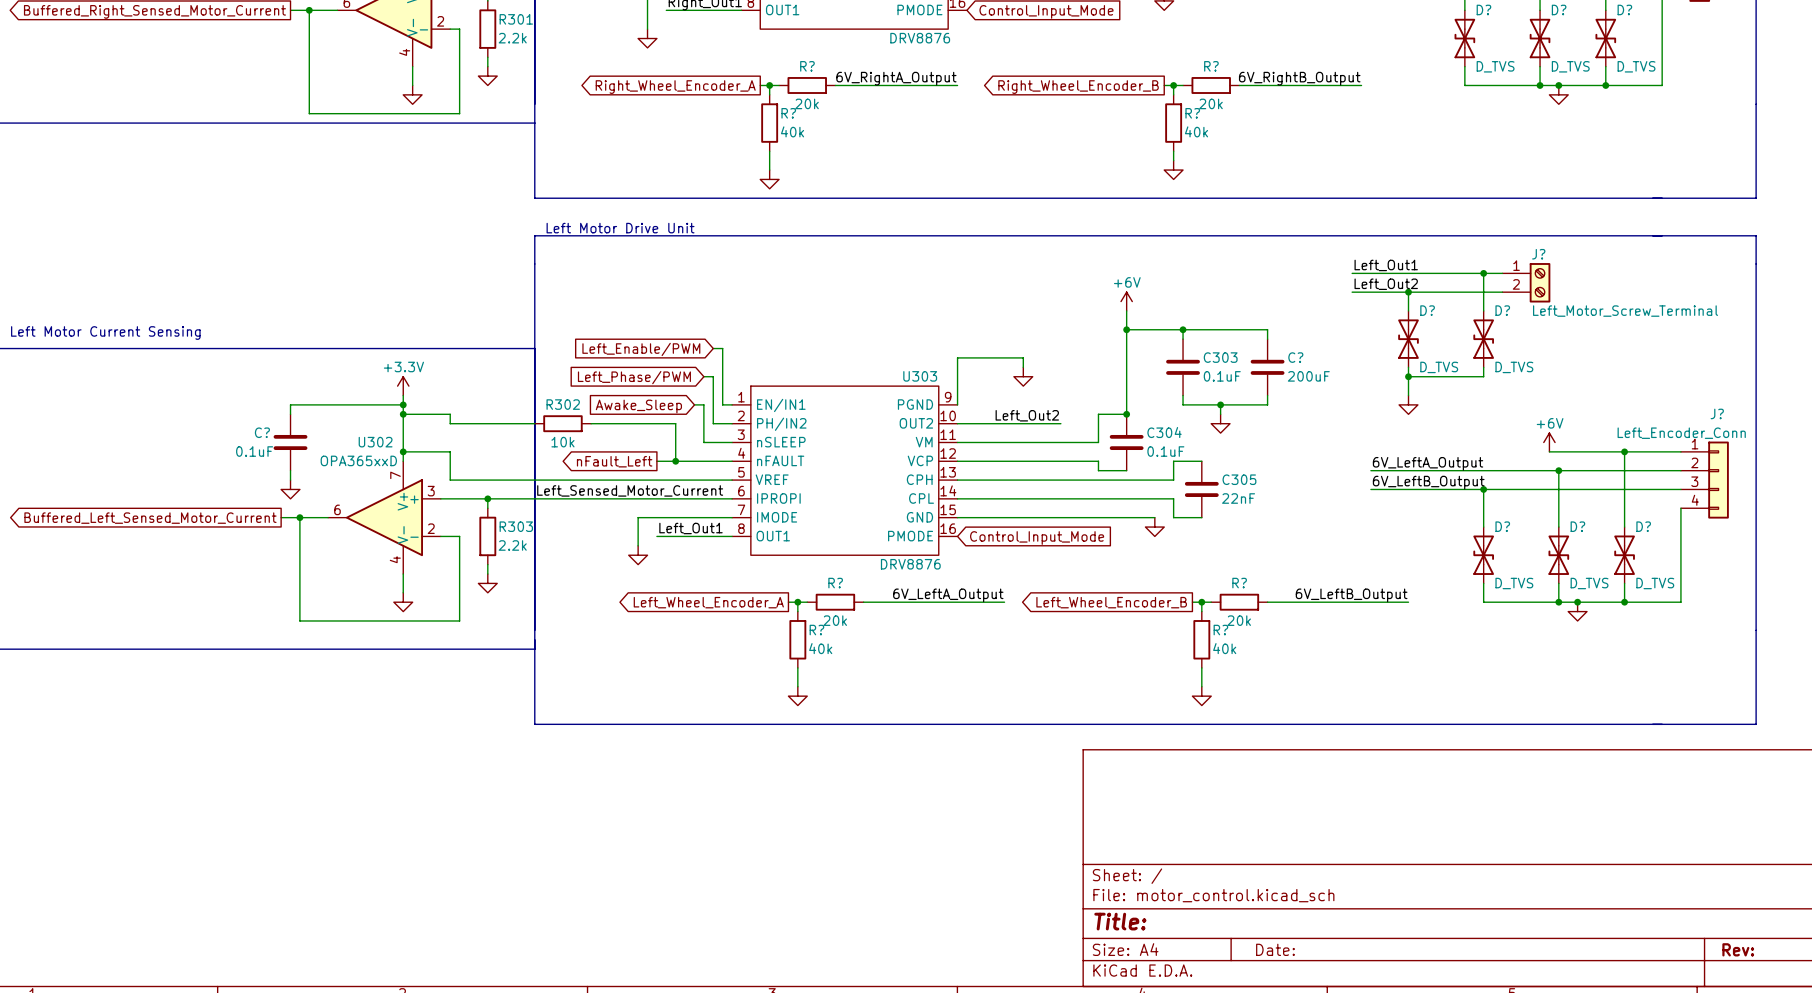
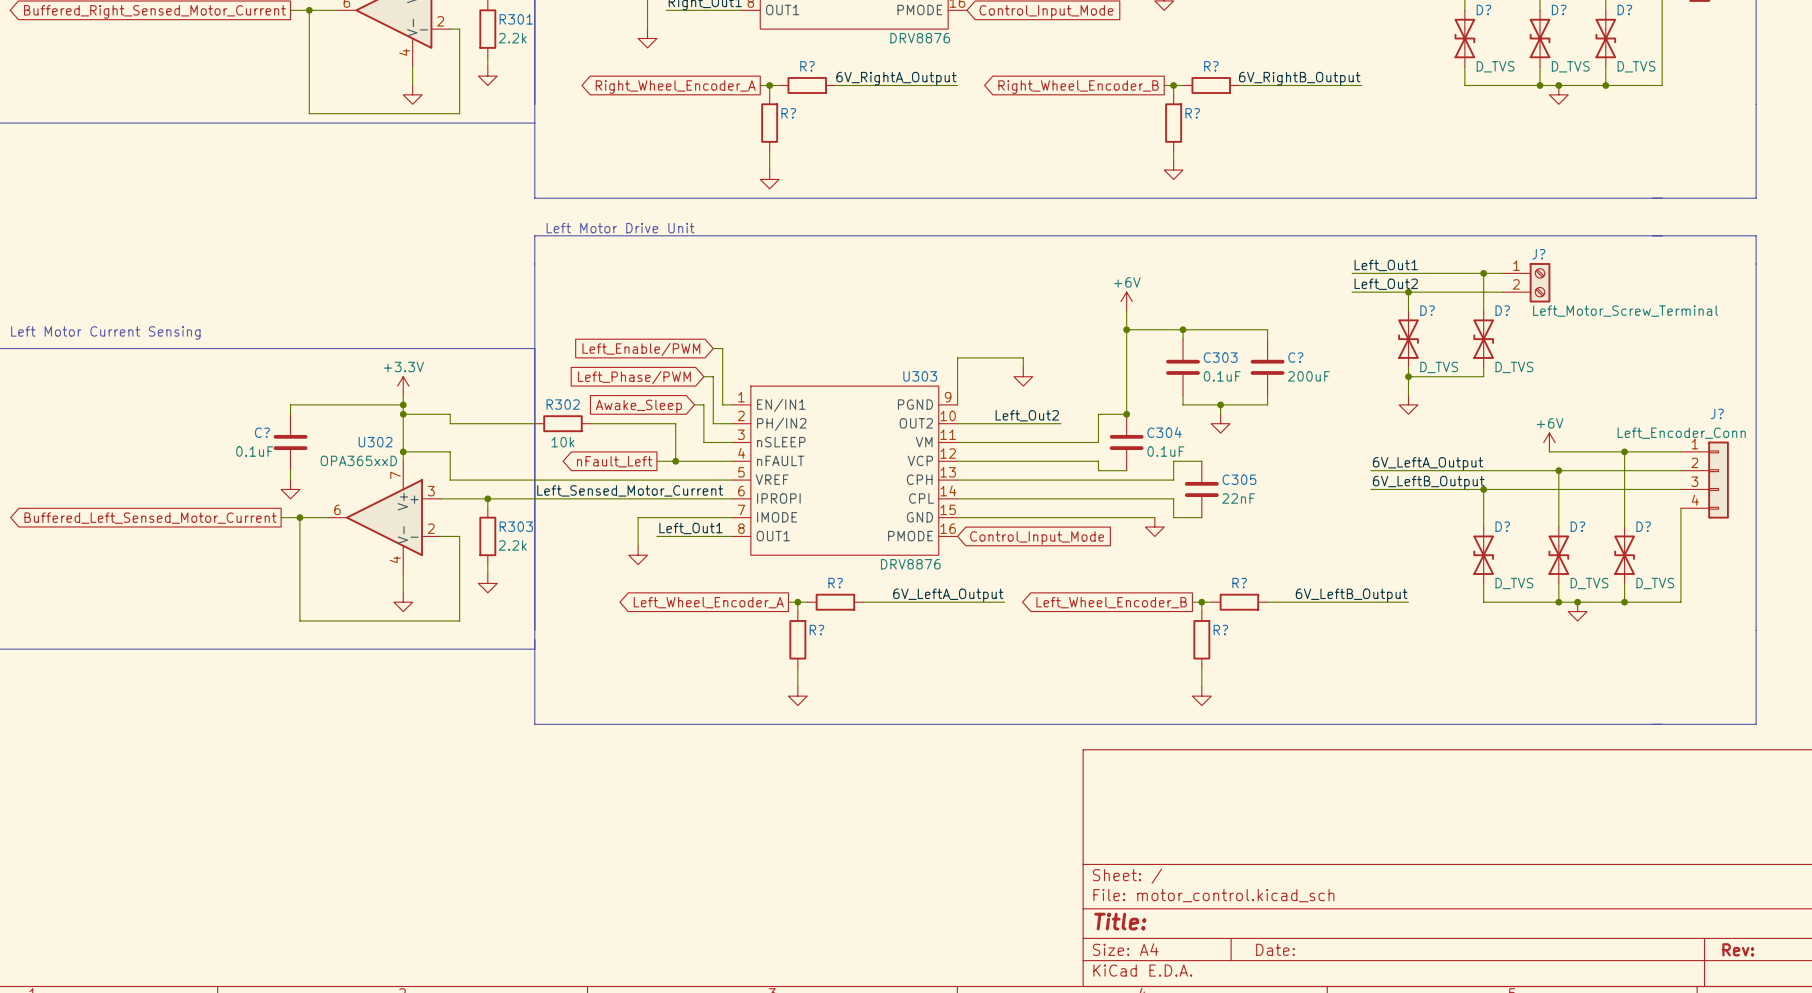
R? value: 20k (807, 103) -> none
R? value: 20k (1210, 103) -> none
R? value: 40k (792, 131) -> none
R? value: 40k (1196, 131) -> none
R? value: 20k (835, 620) -> none
R? value: 20k (1239, 620) -> none
R? value: 40k (820, 648) -> none
R? value: 40k (1224, 648) -> none

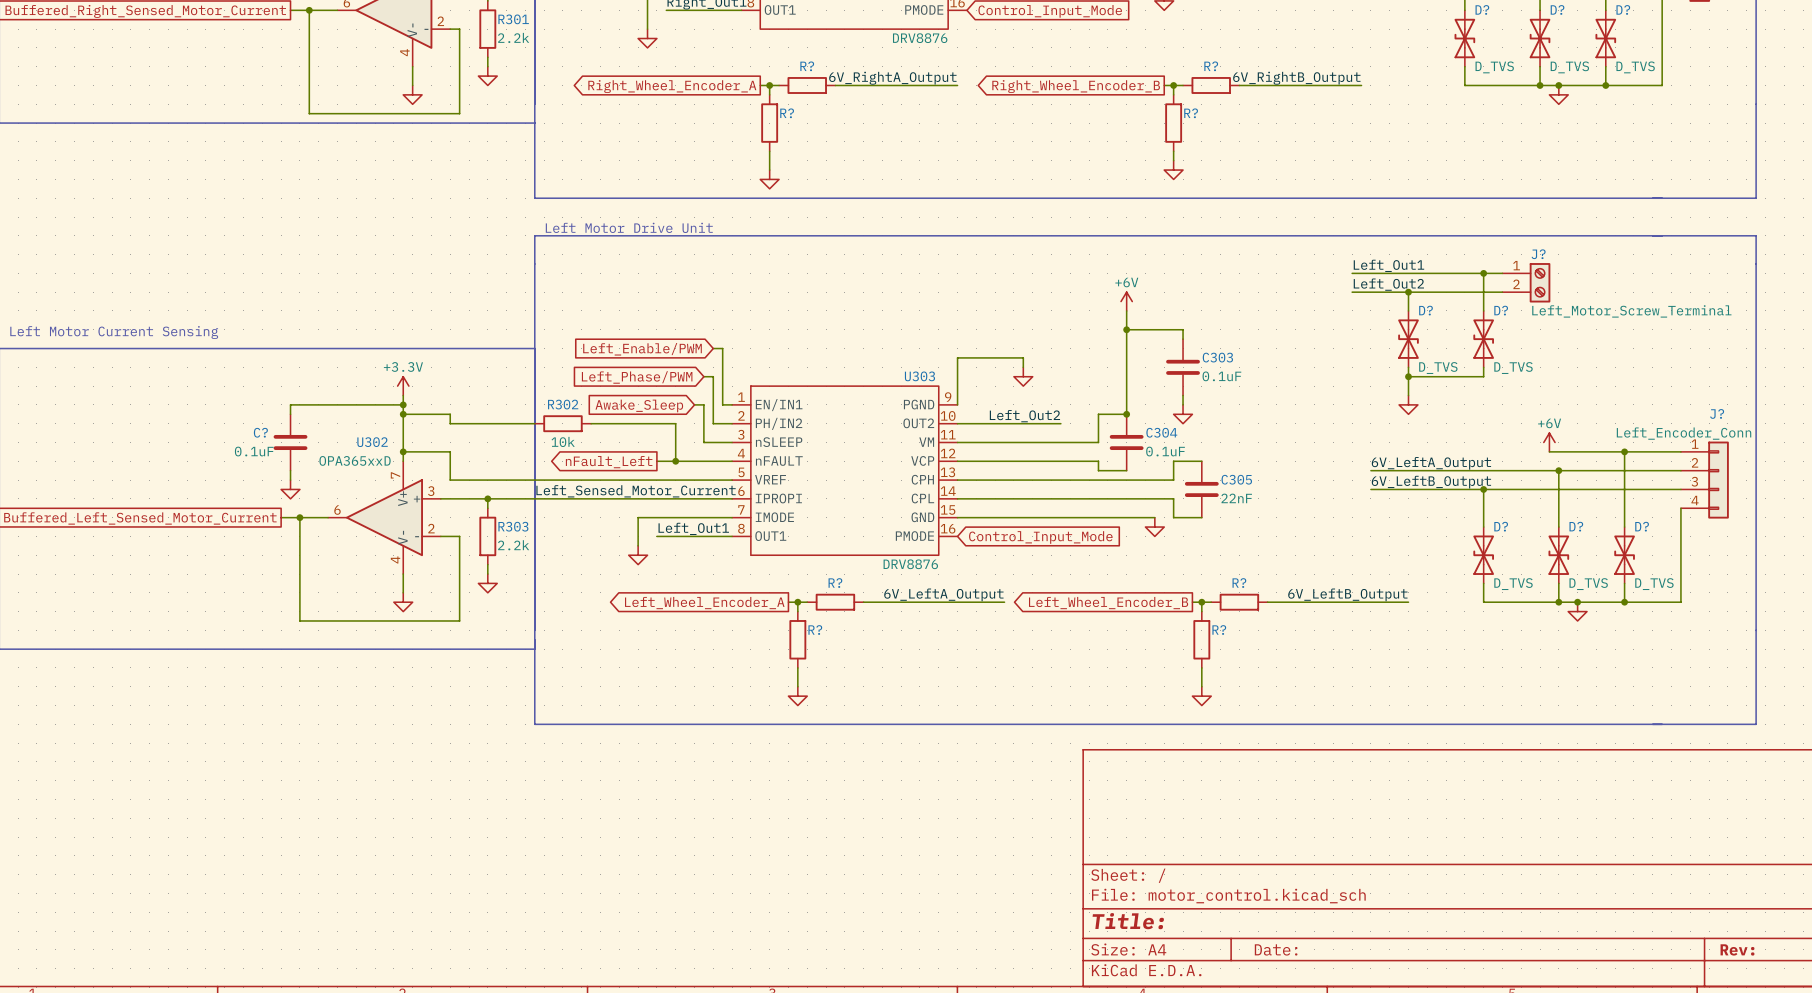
wire: (1183, 329) (1267, 329) (1267, 339) -> none
junction: (1183, 329) -> none
C?: 200uF (1267, 367) -> none
wire: (1267, 395) (1267, 404) (1183, 404) -> none
wire: (1220, 404) (1220, 414) -> none
junction: (1220, 404) -> none
power symbol position: (1220, 423) -> (1183, 414)

